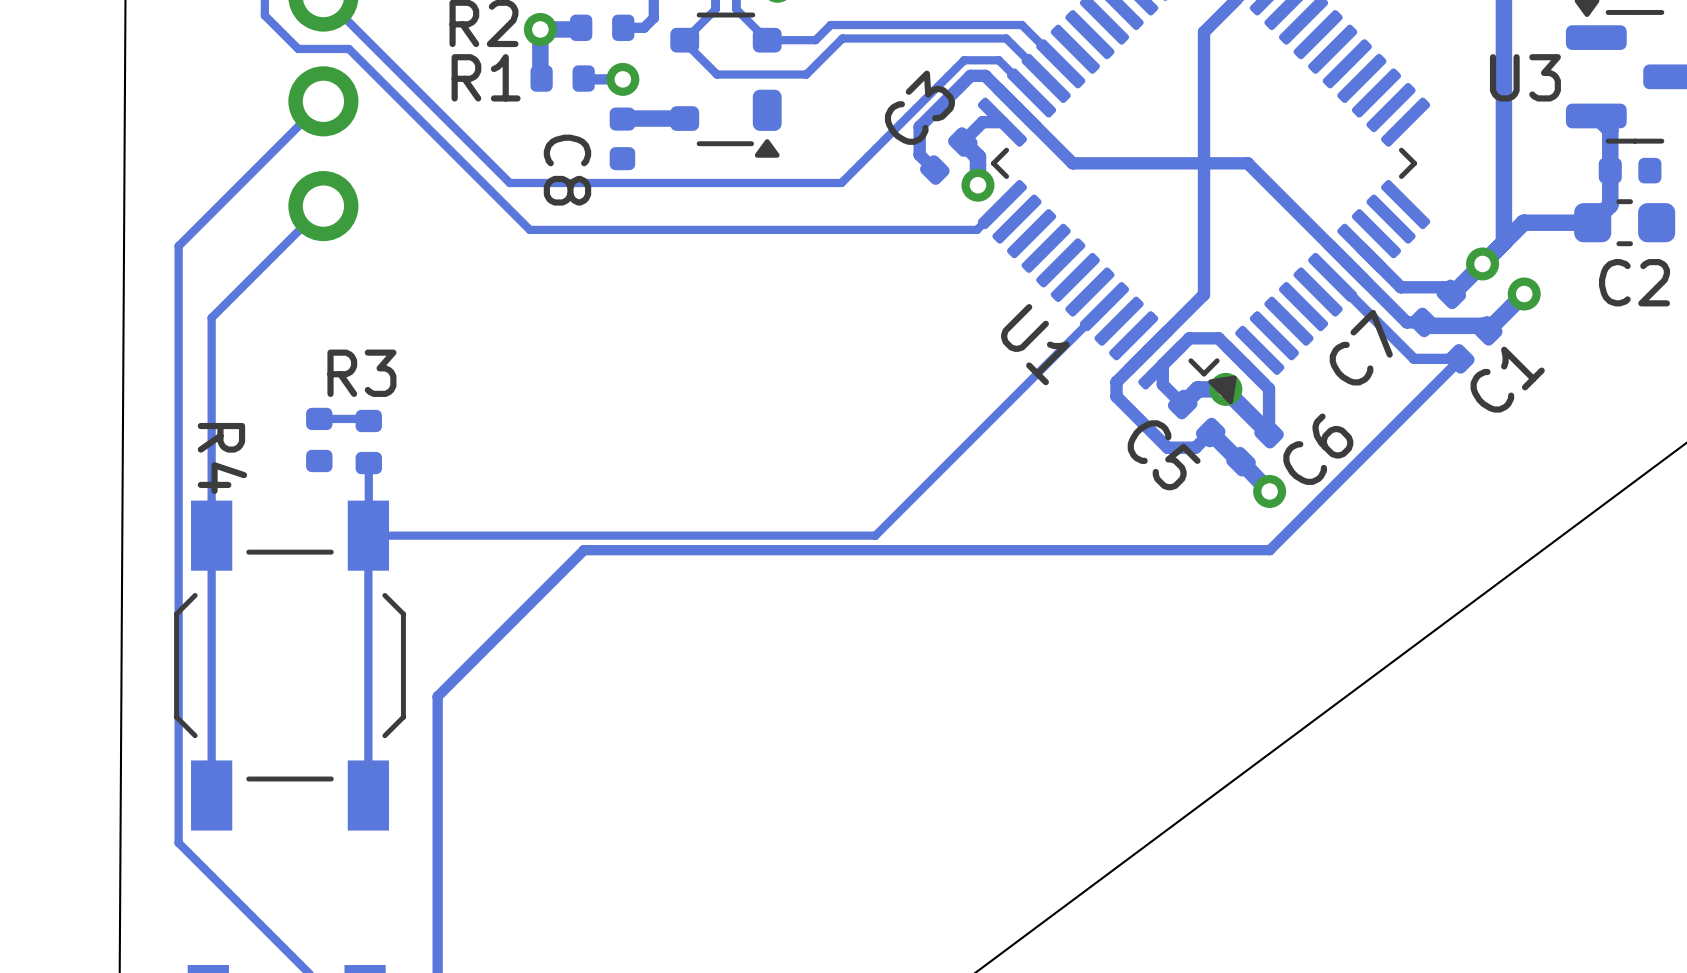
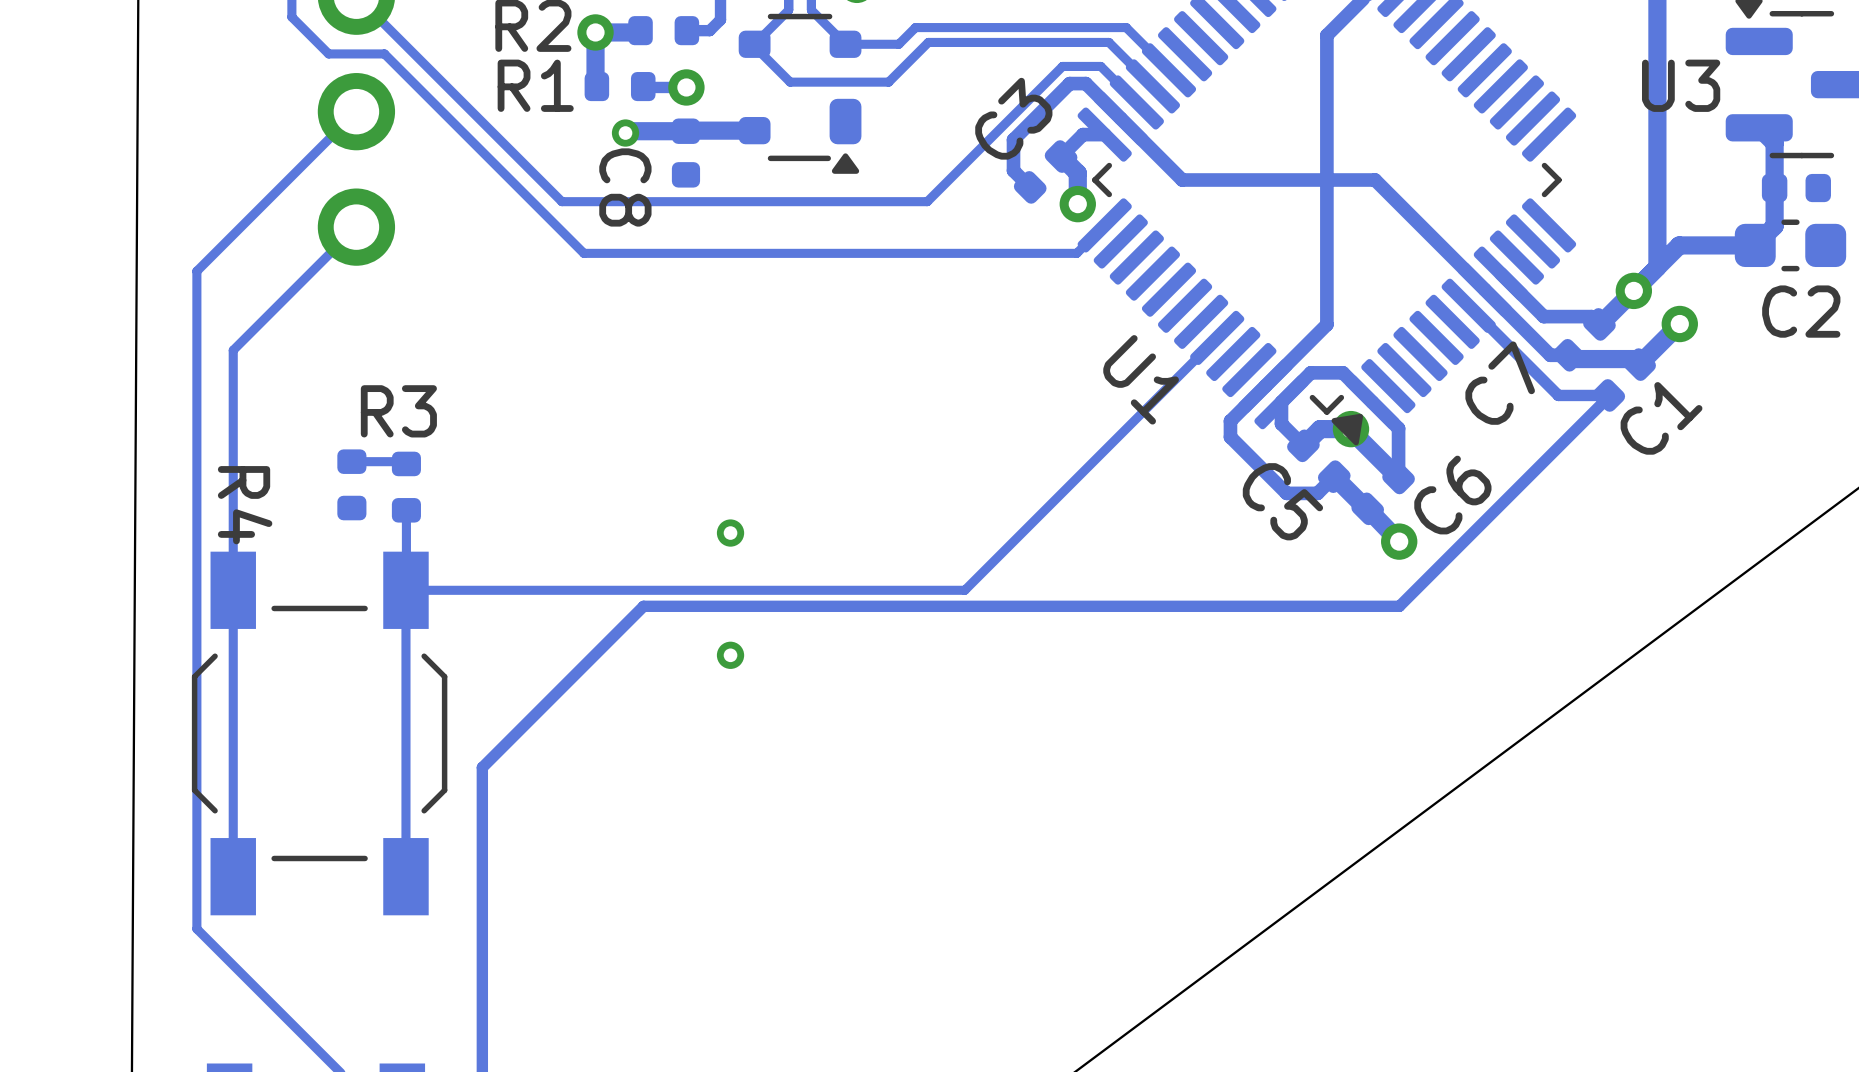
track: none -> (685, 131) (627, 131) (625, 133)
via: none -> (625, 133)
via: none -> (730, 533)
via: none -> (730, 655)

